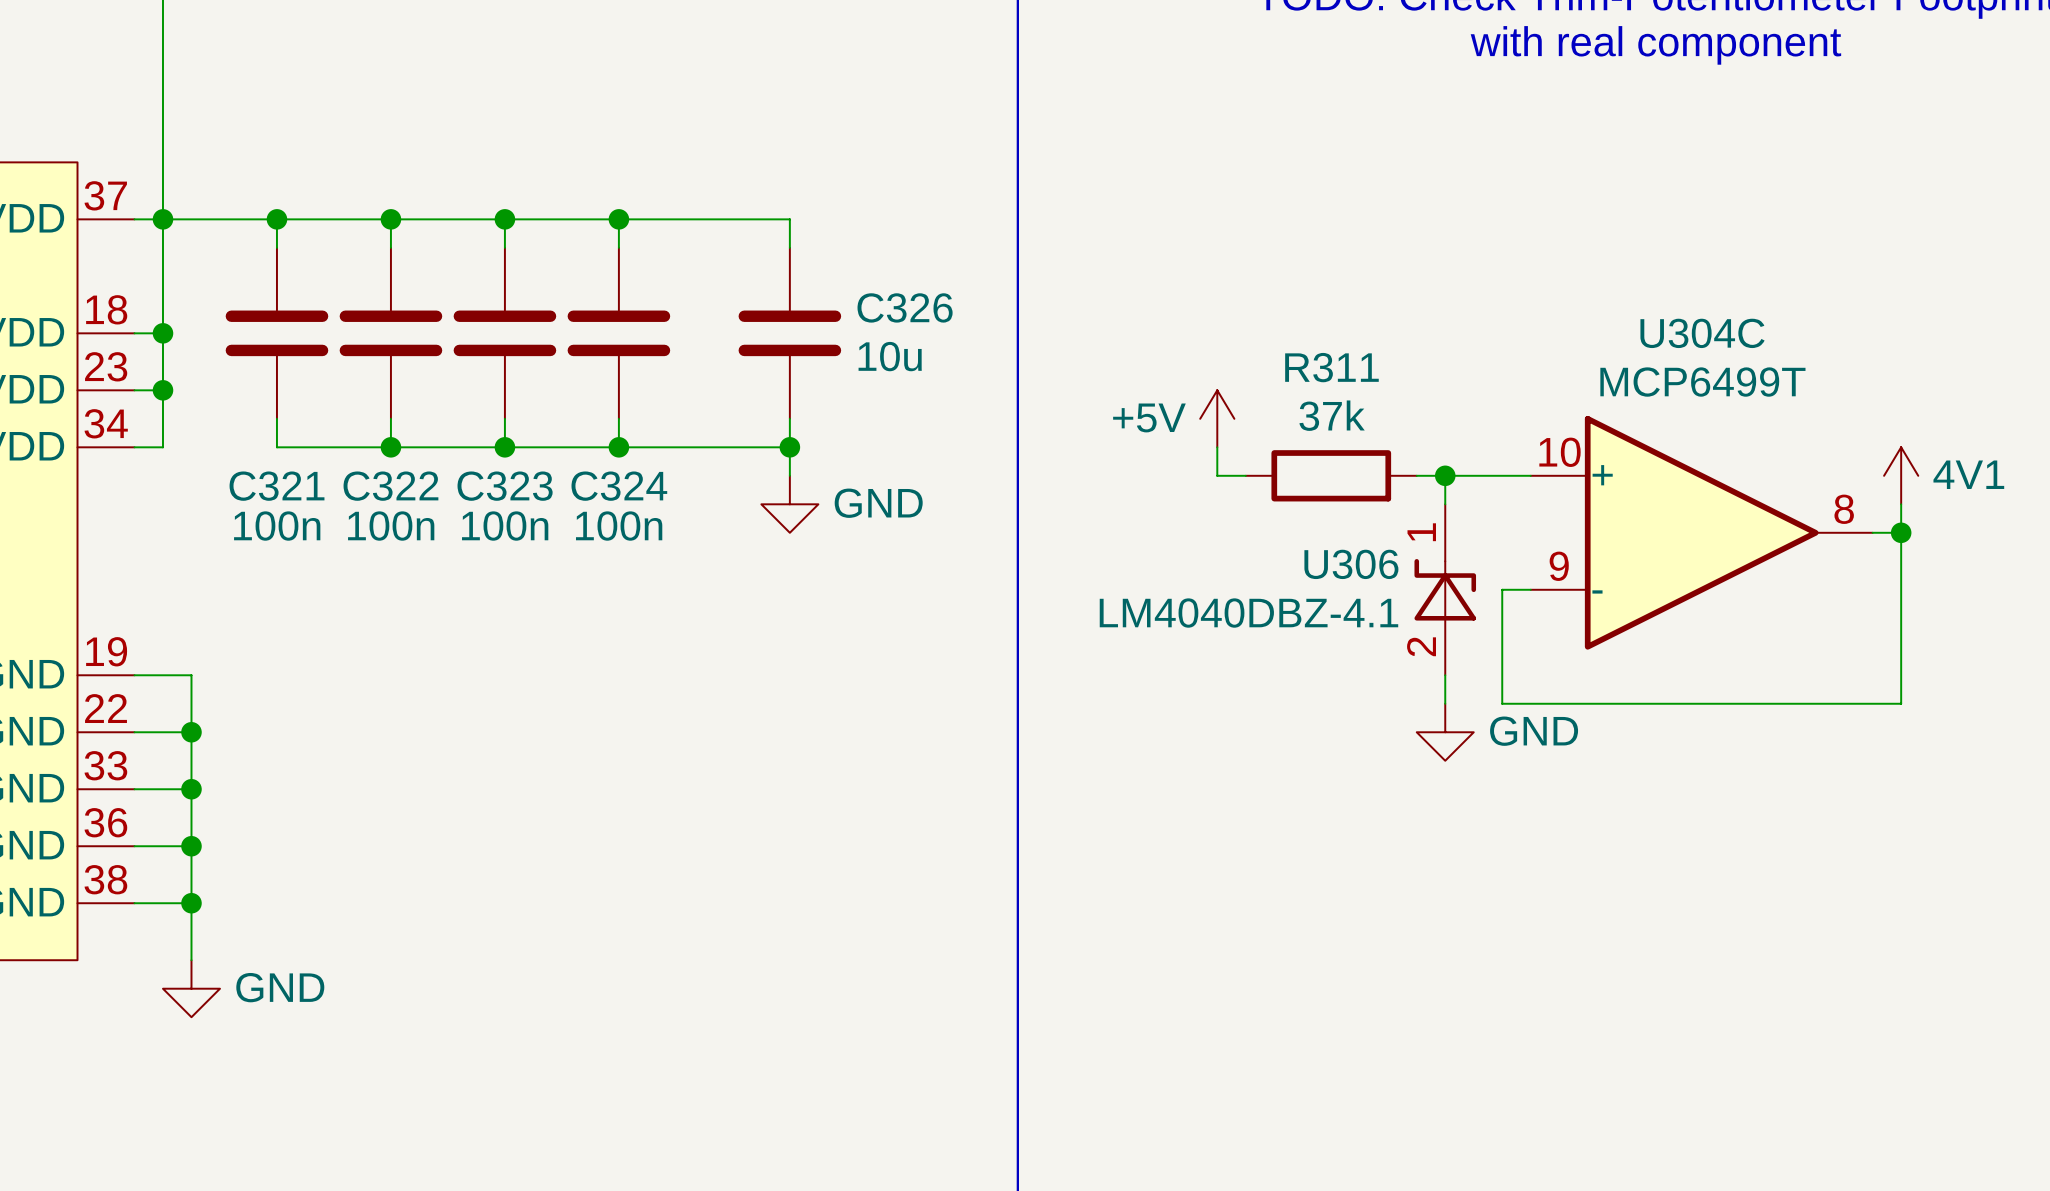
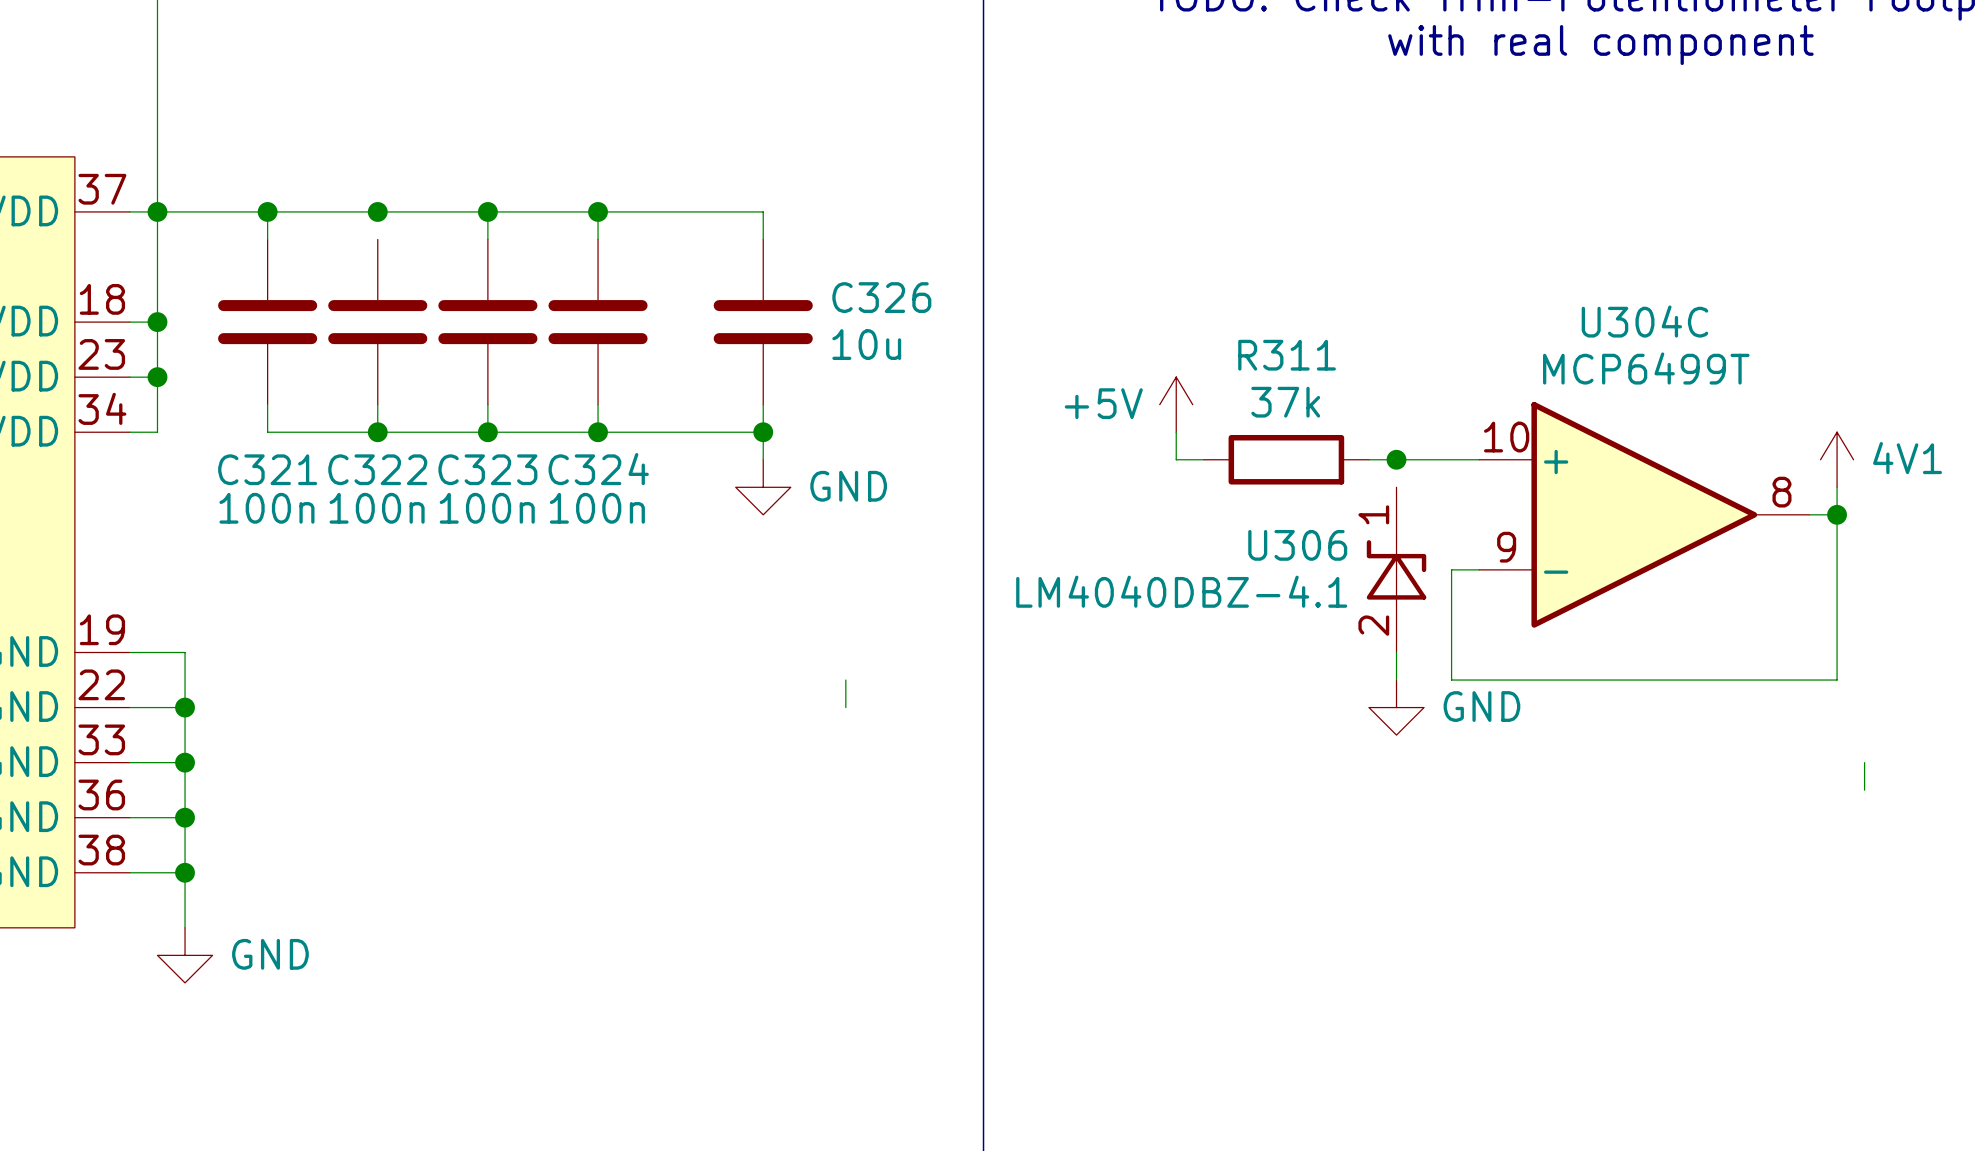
wire: (390, 219) (390, 247) -> none
wire: (1445, 475) (1445, 504) -> none
wire: none -> (845, 680) (845, 707)
wire: none -> (1864, 762) (1864, 790)

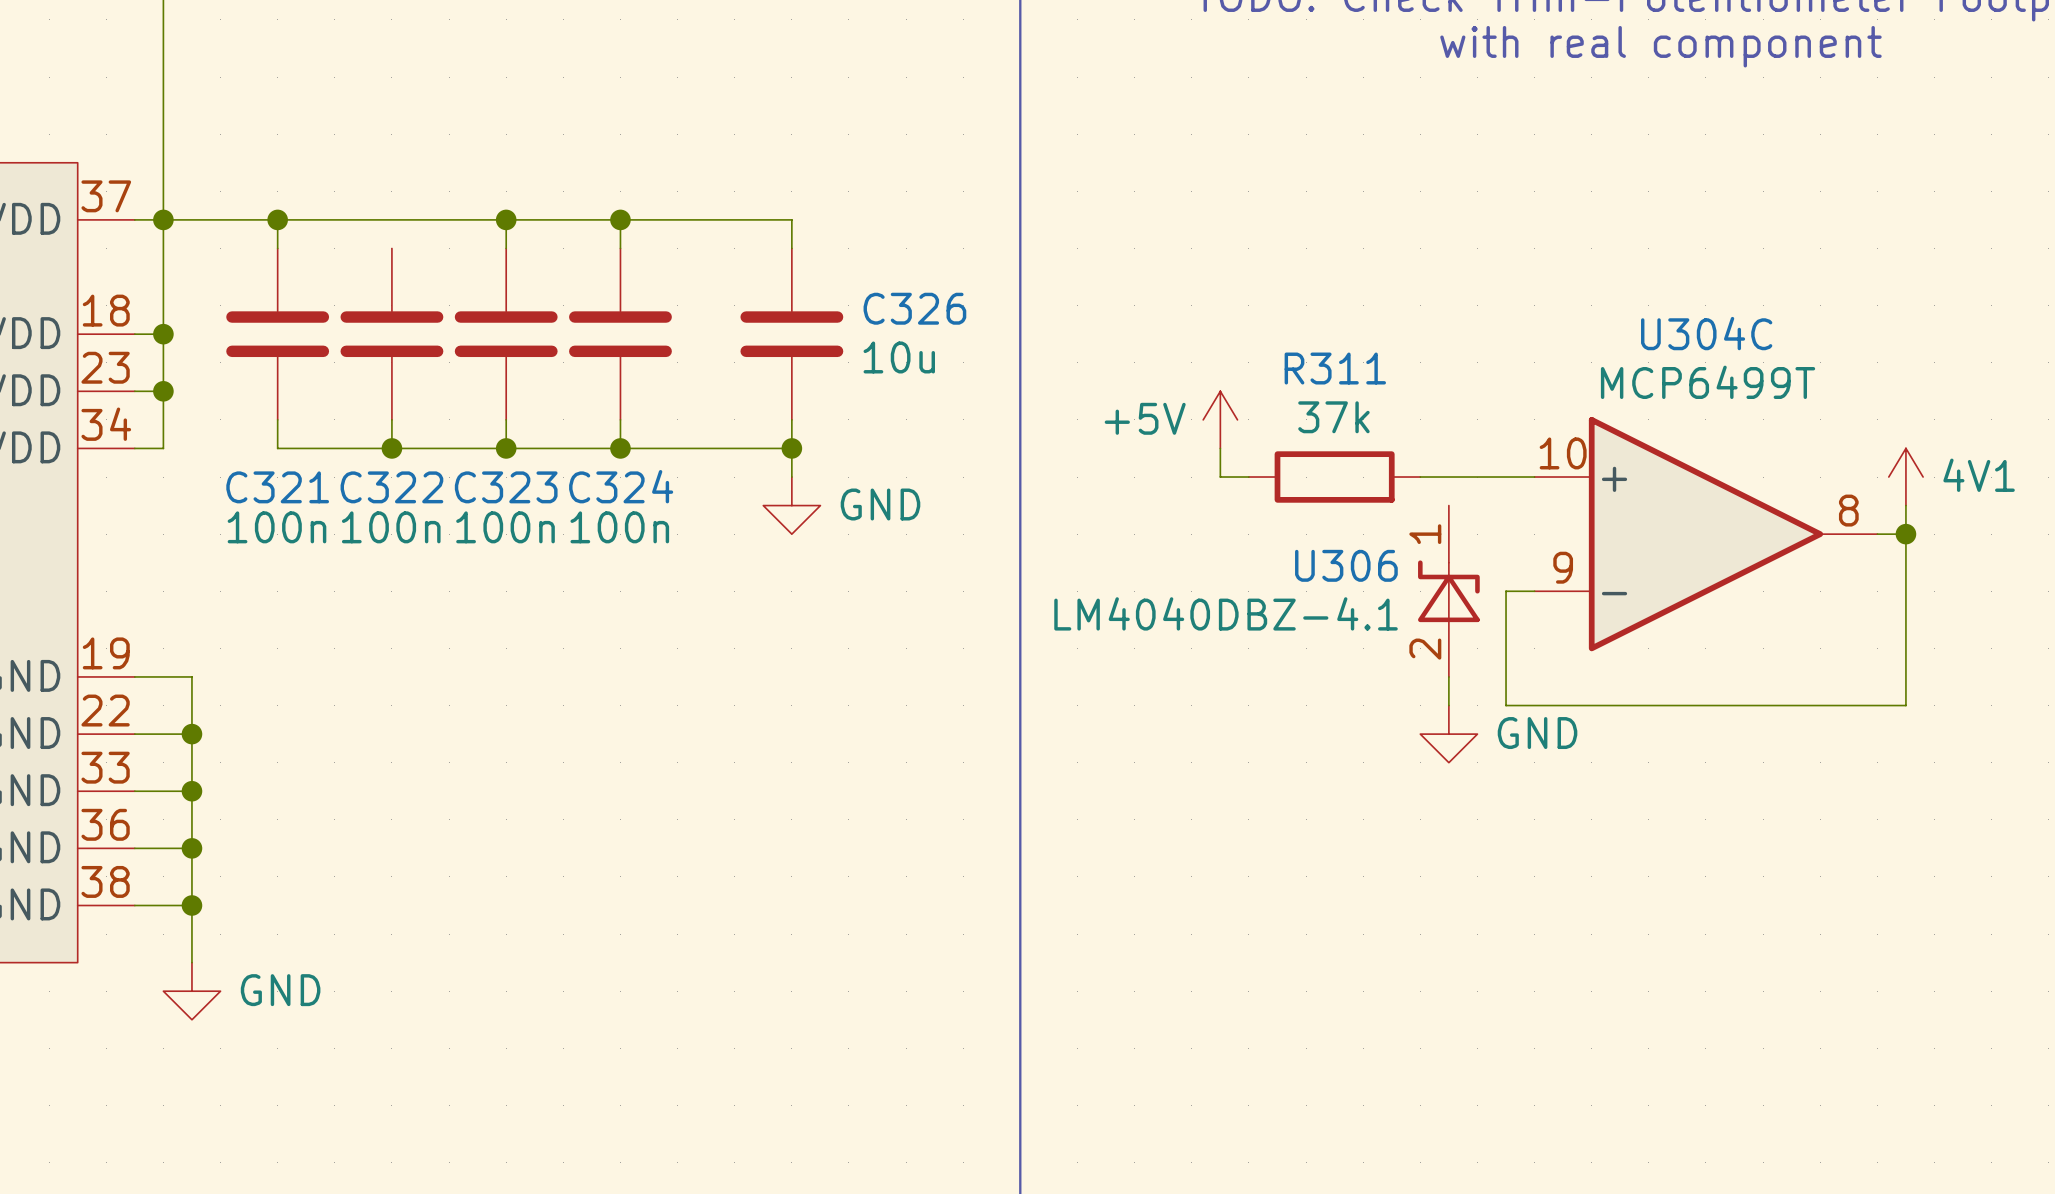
junction: (377, 211) -> none
junction: (1396, 459) -> none
wire: (845, 680) (845, 707) -> none
wire: (1864, 762) (1864, 790) -> none

